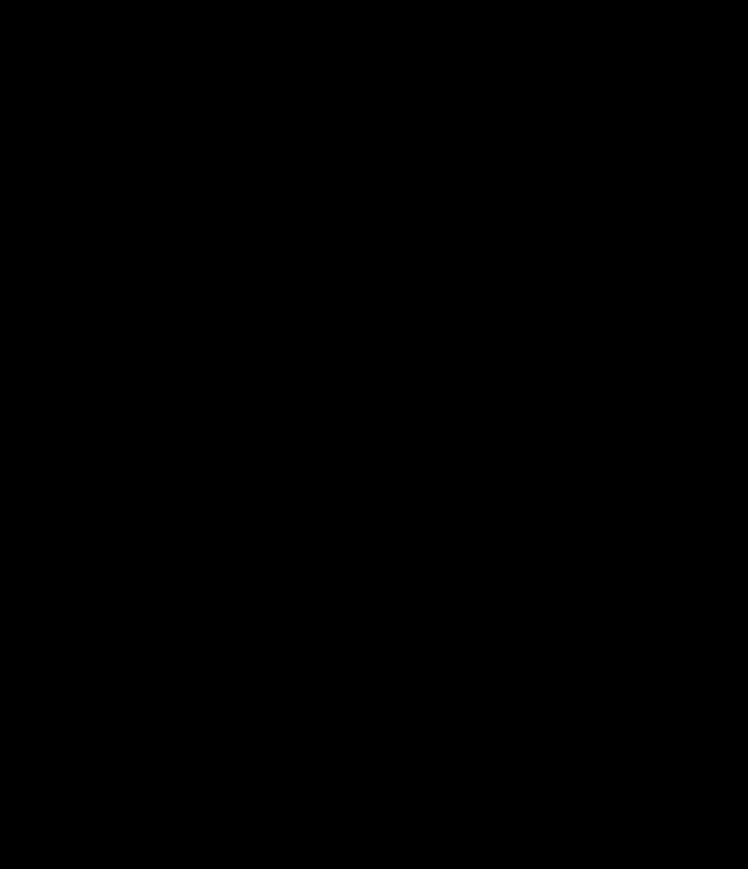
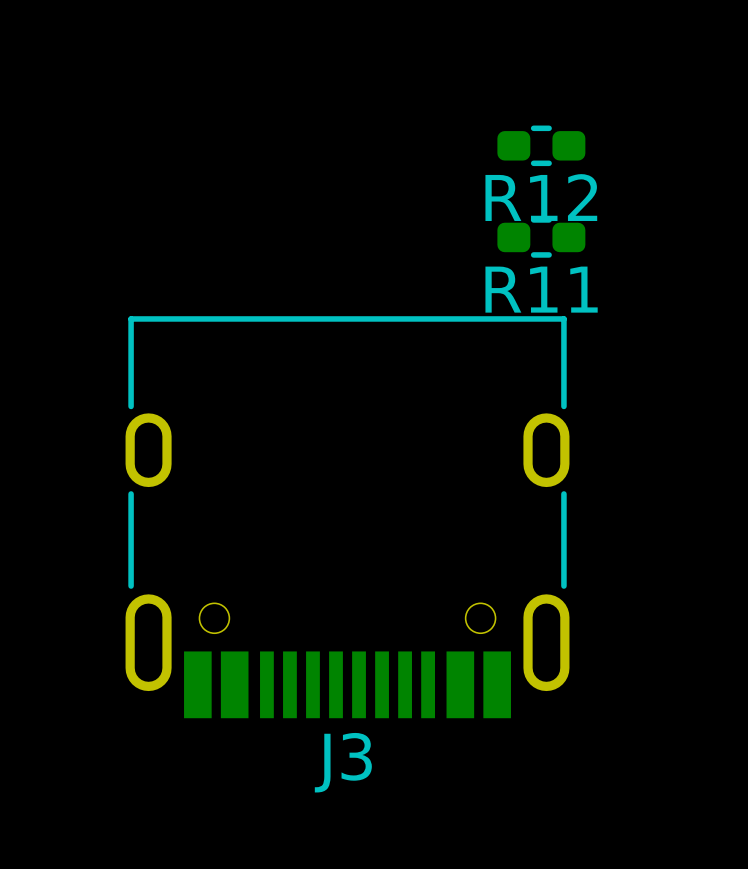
R12: none -> (541, 145)
R11: none -> (541, 237)
J3: none -> (347, 517)

